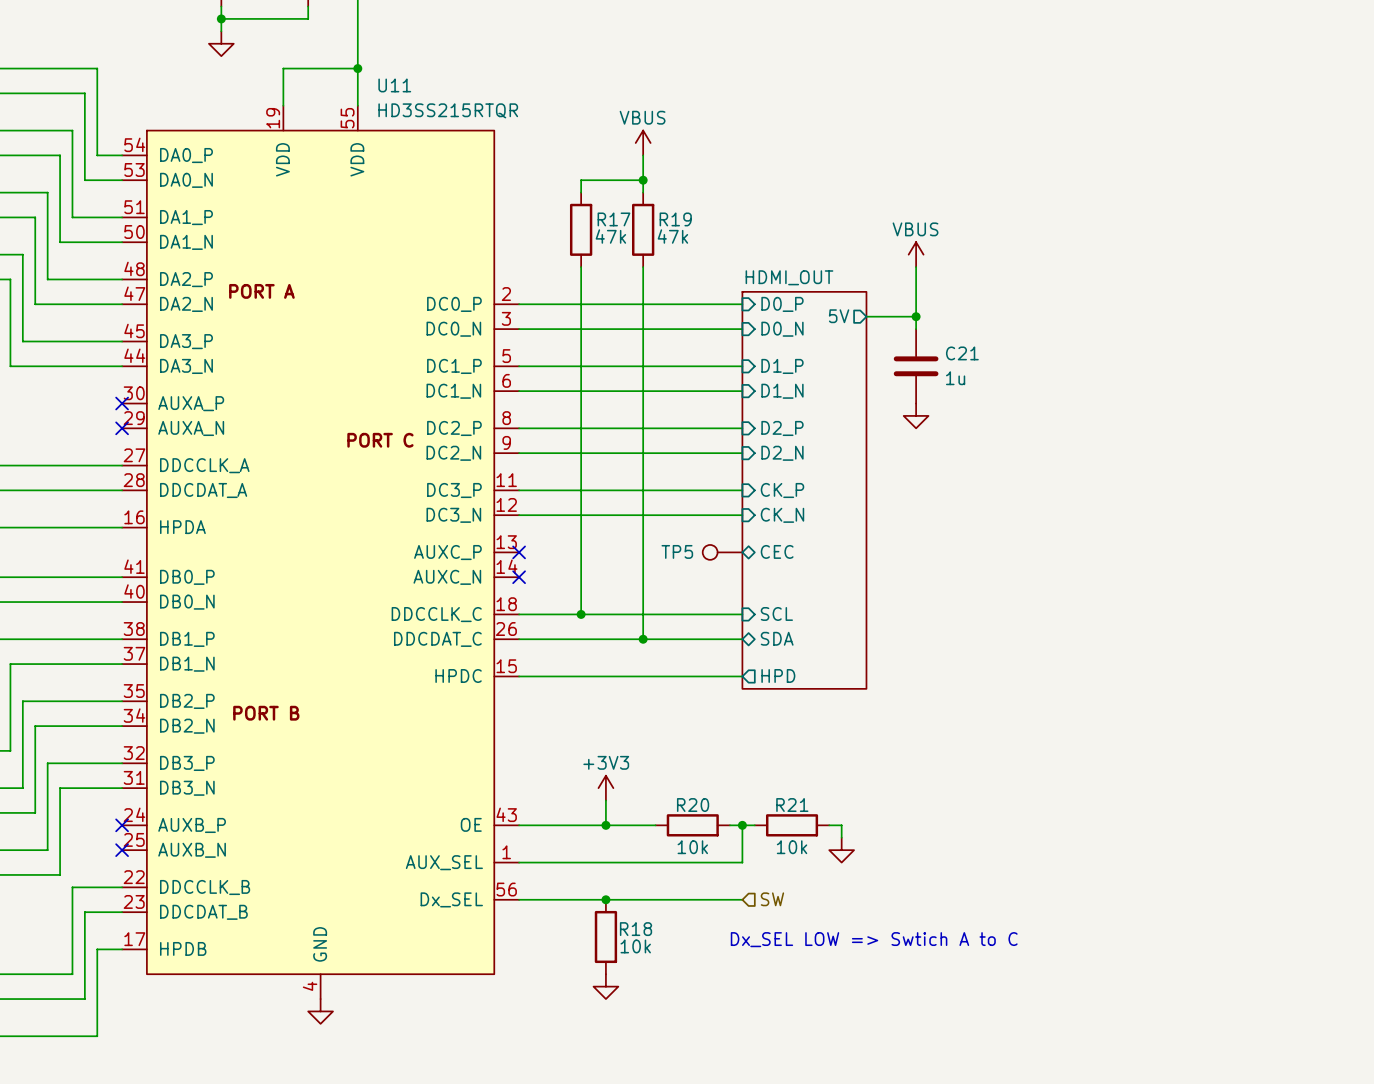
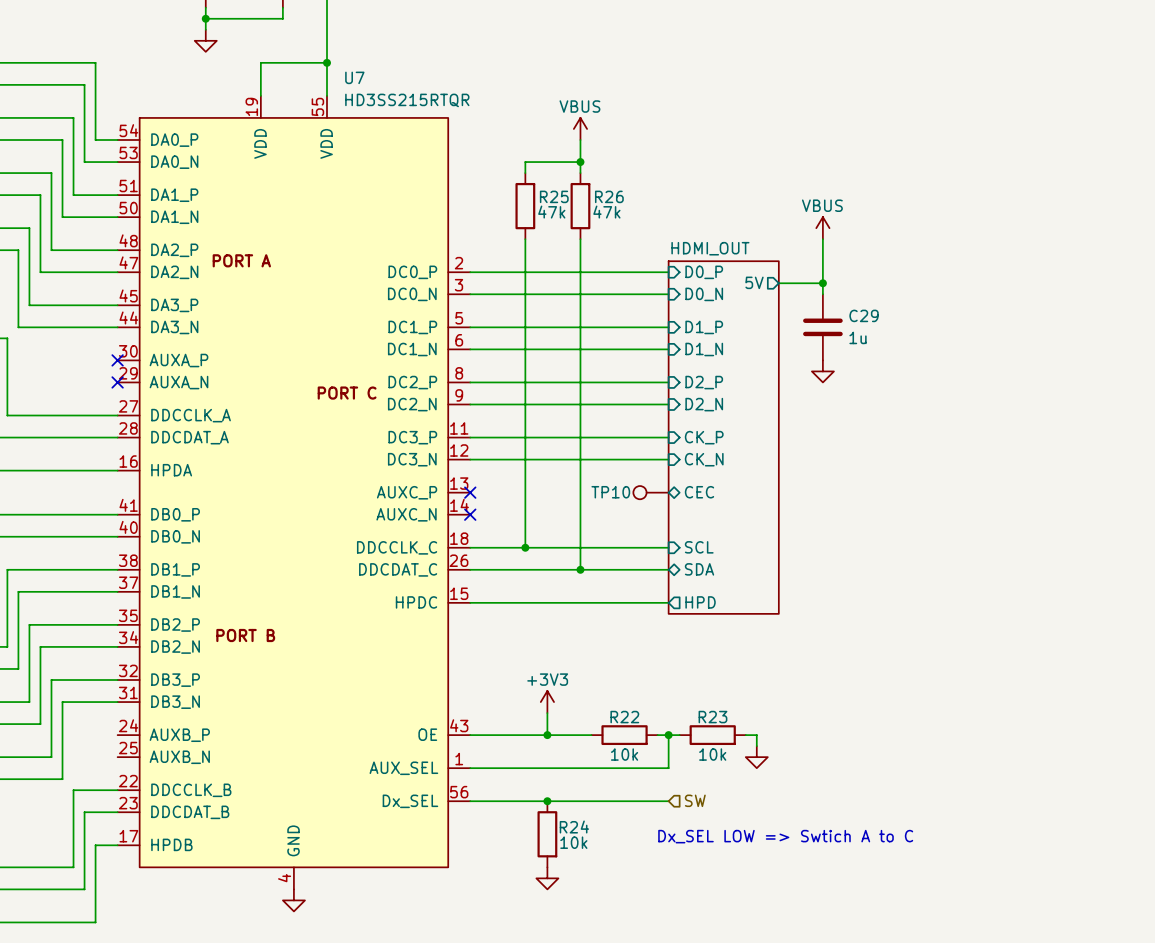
U11 name: U11 (394, 85) -> U7 (354, 77)
R17 name: R17 (613, 219) -> R25 (554, 196)
R19 name: R19 (675, 219) -> R26 (609, 196)
C21 name: C21 (962, 353) -> C29 (864, 315)
TP5 name: TP5 (677, 551) -> TP10 (610, 492)
R20 name: R20 (693, 805) -> R22 (624, 717)
R21 name: R21 (792, 805) -> R23 (712, 717)
no-connect mark: (122, 825) -> none
no-connect mark: (122, 850) -> none
R18 name: R18 (636, 929) -> R24 (574, 827)

